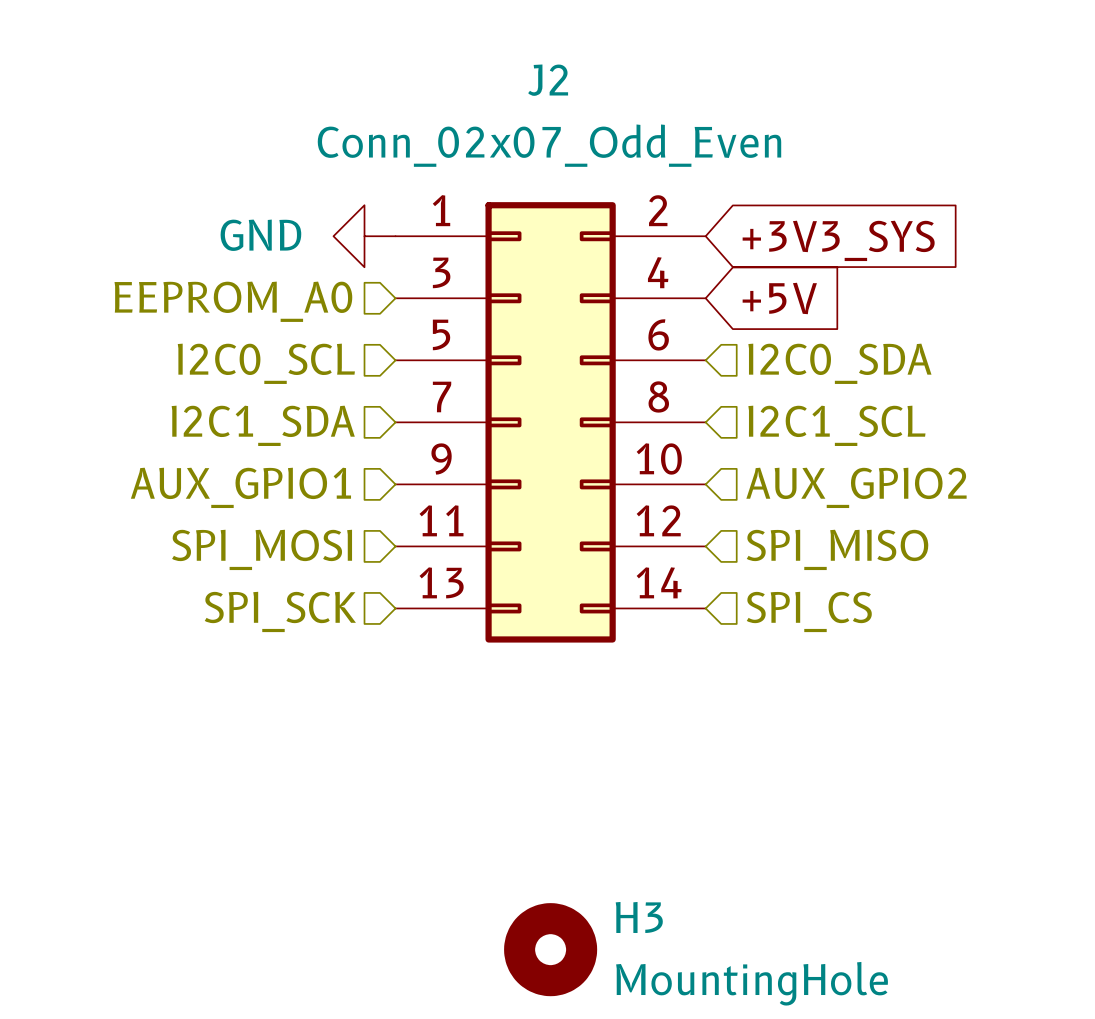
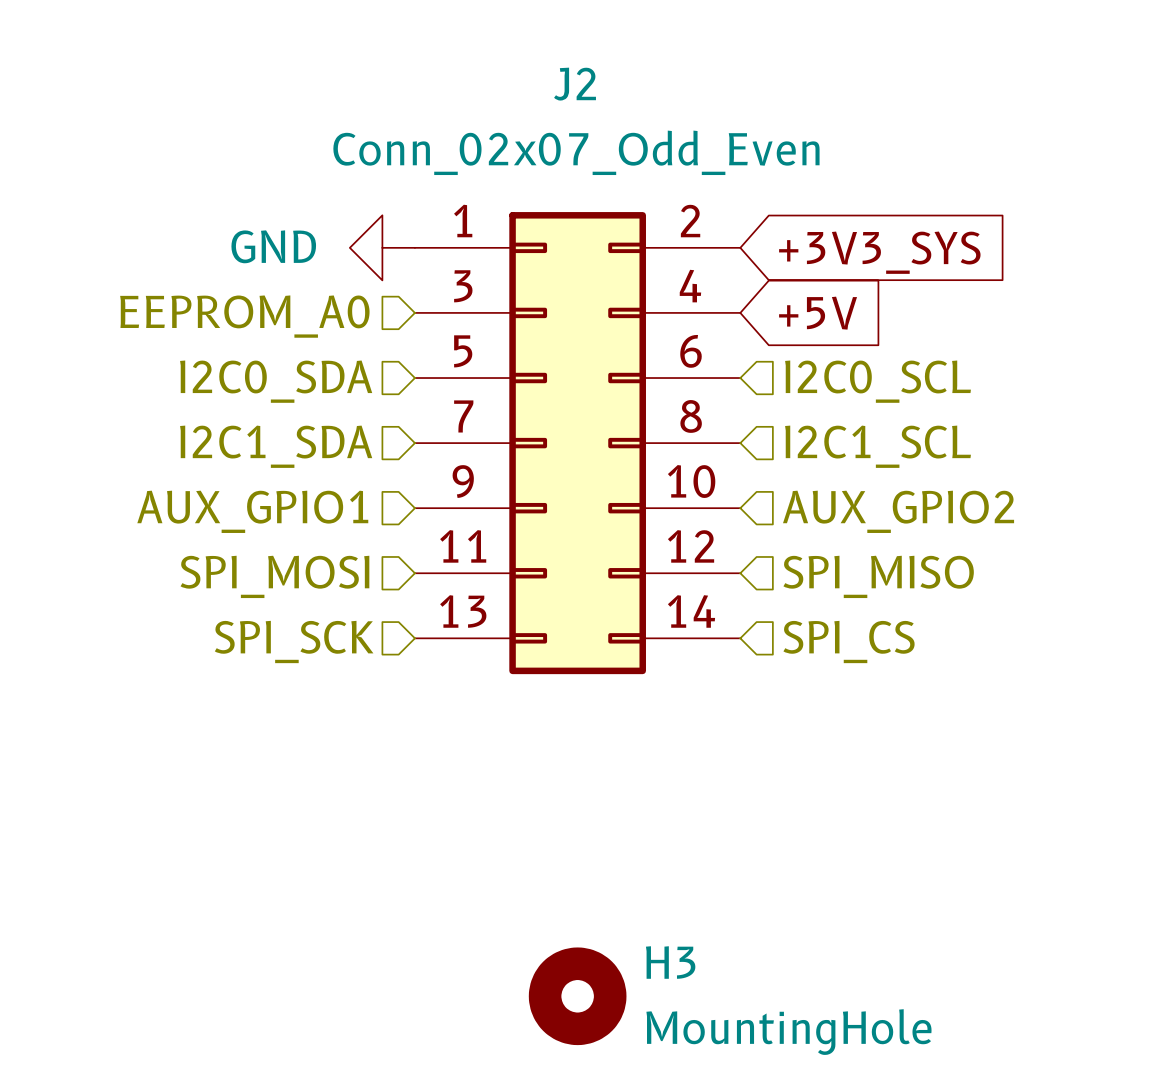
hierarchical label: I2C0_SCL (266, 363) -> I2C0_SDA (276, 381)
hierarchical label: I2C0_SDA (839, 363) -> I2C0_SCL (878, 381)

